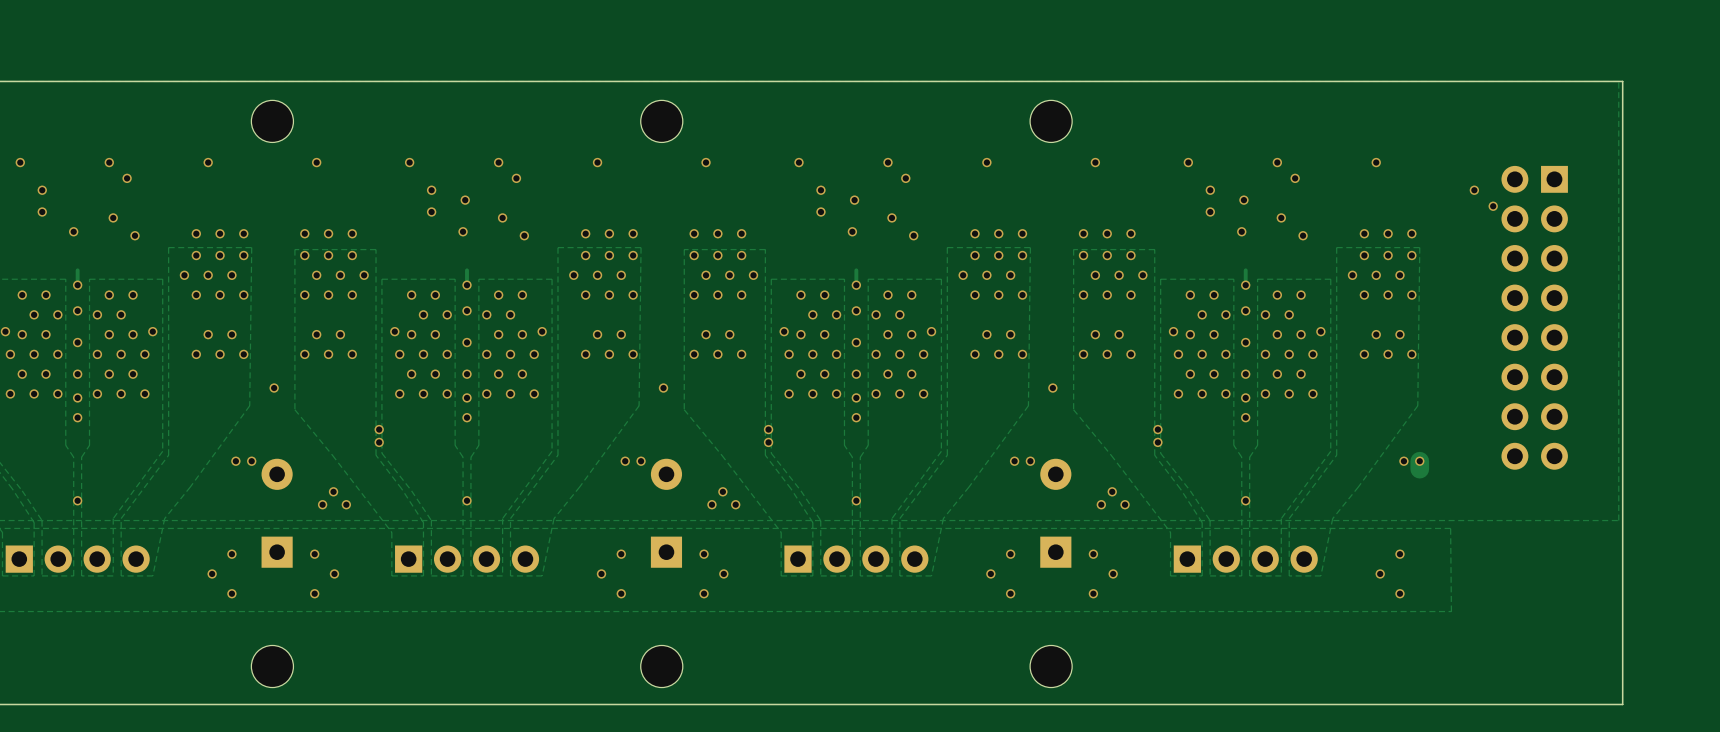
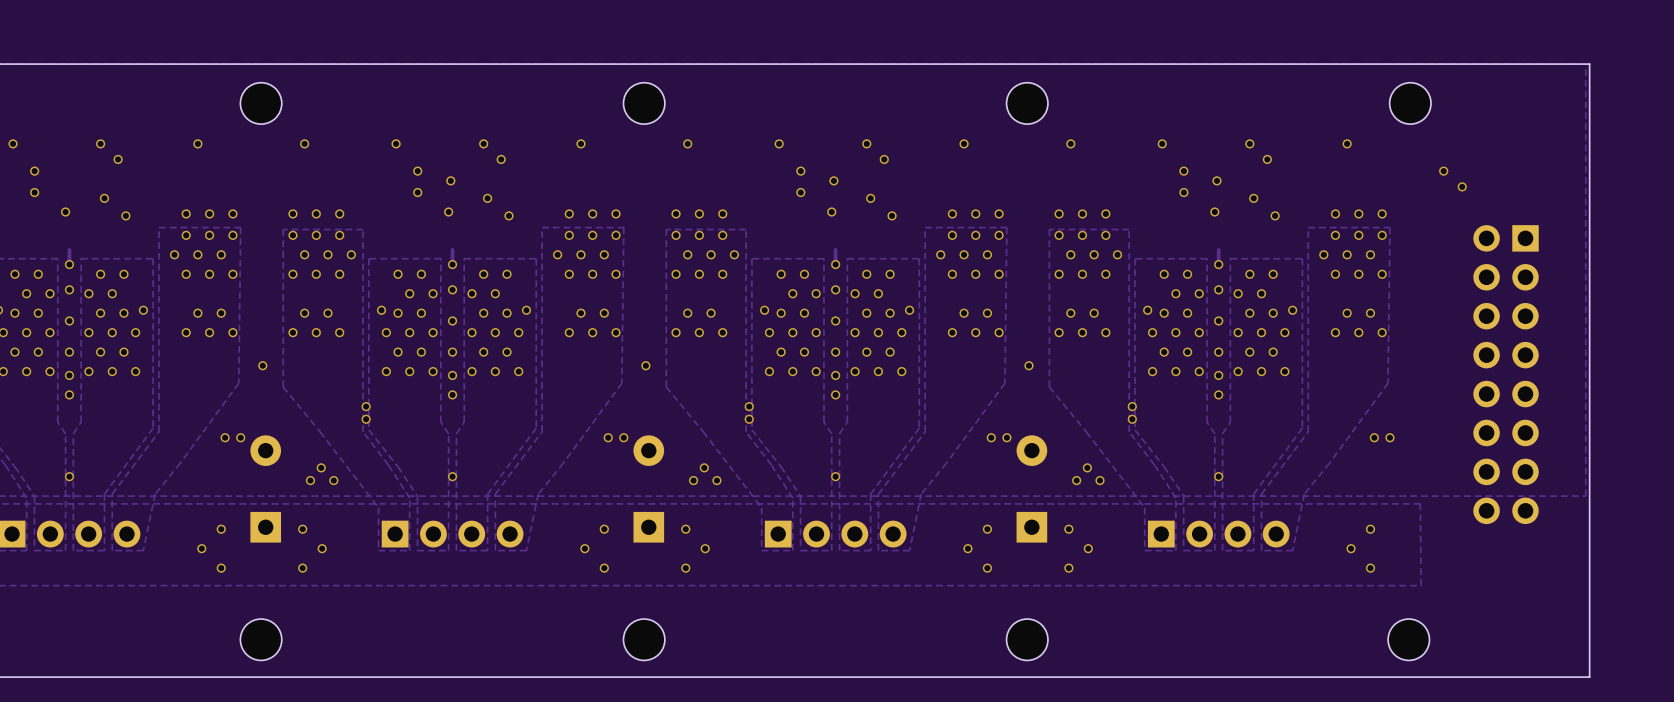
part: none -> (1410, 103)
part position: (1534, 317) -> (1506, 374)
track: (1419, 461) (1419, 469) -> none
part: none -> (1408, 639)

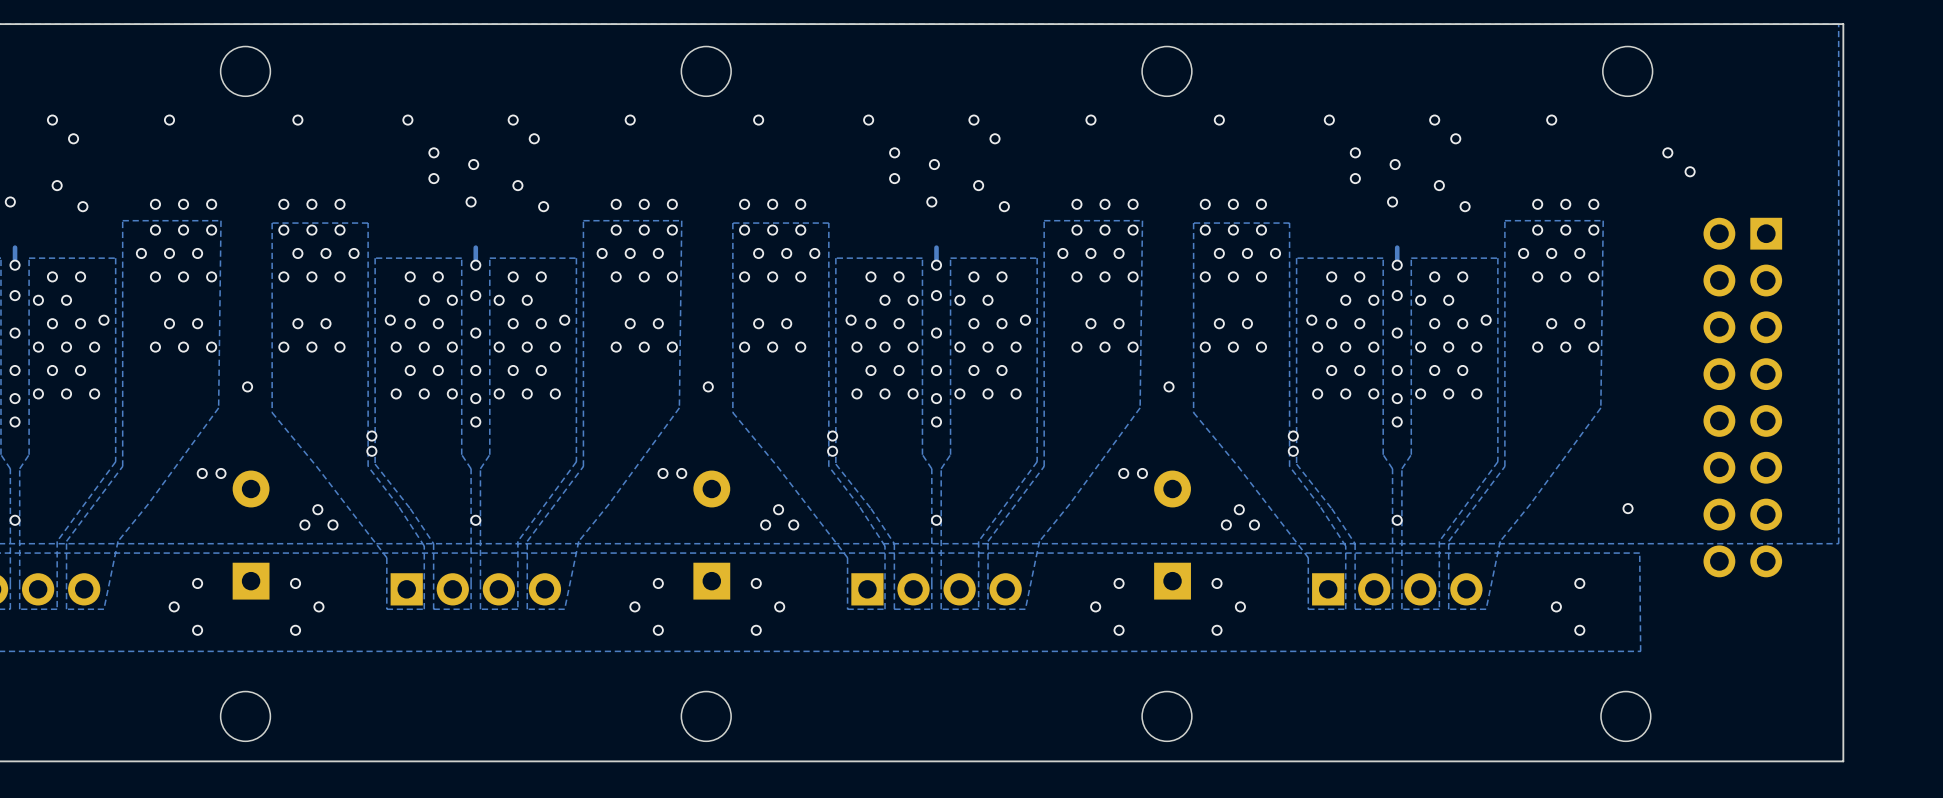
via: (1374, 437) -> none
via: (1389, 437) -> none
via: none -> (1628, 508)

